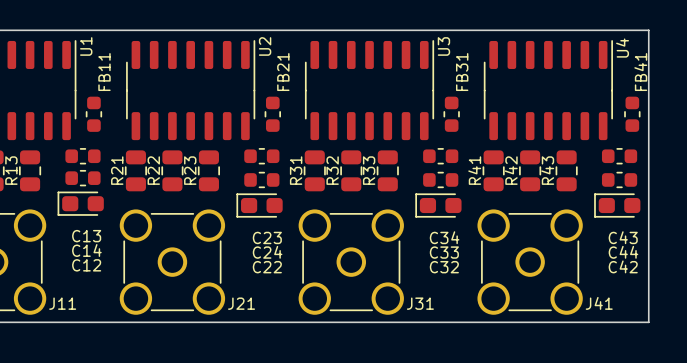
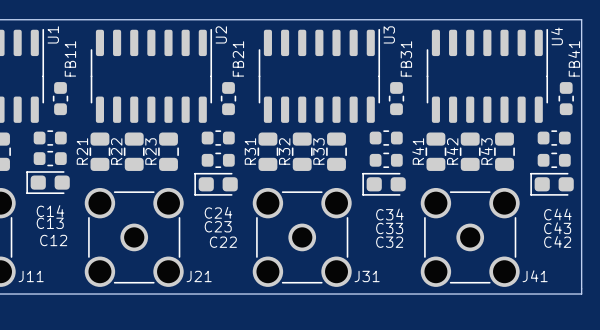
C13 name: C13 (86, 236) -> C14 (50, 211)
C23 name position: C23 (267, 237) -> C23 (218, 226)
C43 name: C43 (623, 237) -> C44 (557, 214)
C14 name: C14 (86, 250) -> C13 (50, 223)
C24 name position: C24 (267, 252) -> C24 (218, 212)
C44 name: C44 (623, 252) -> C43 (557, 228)

